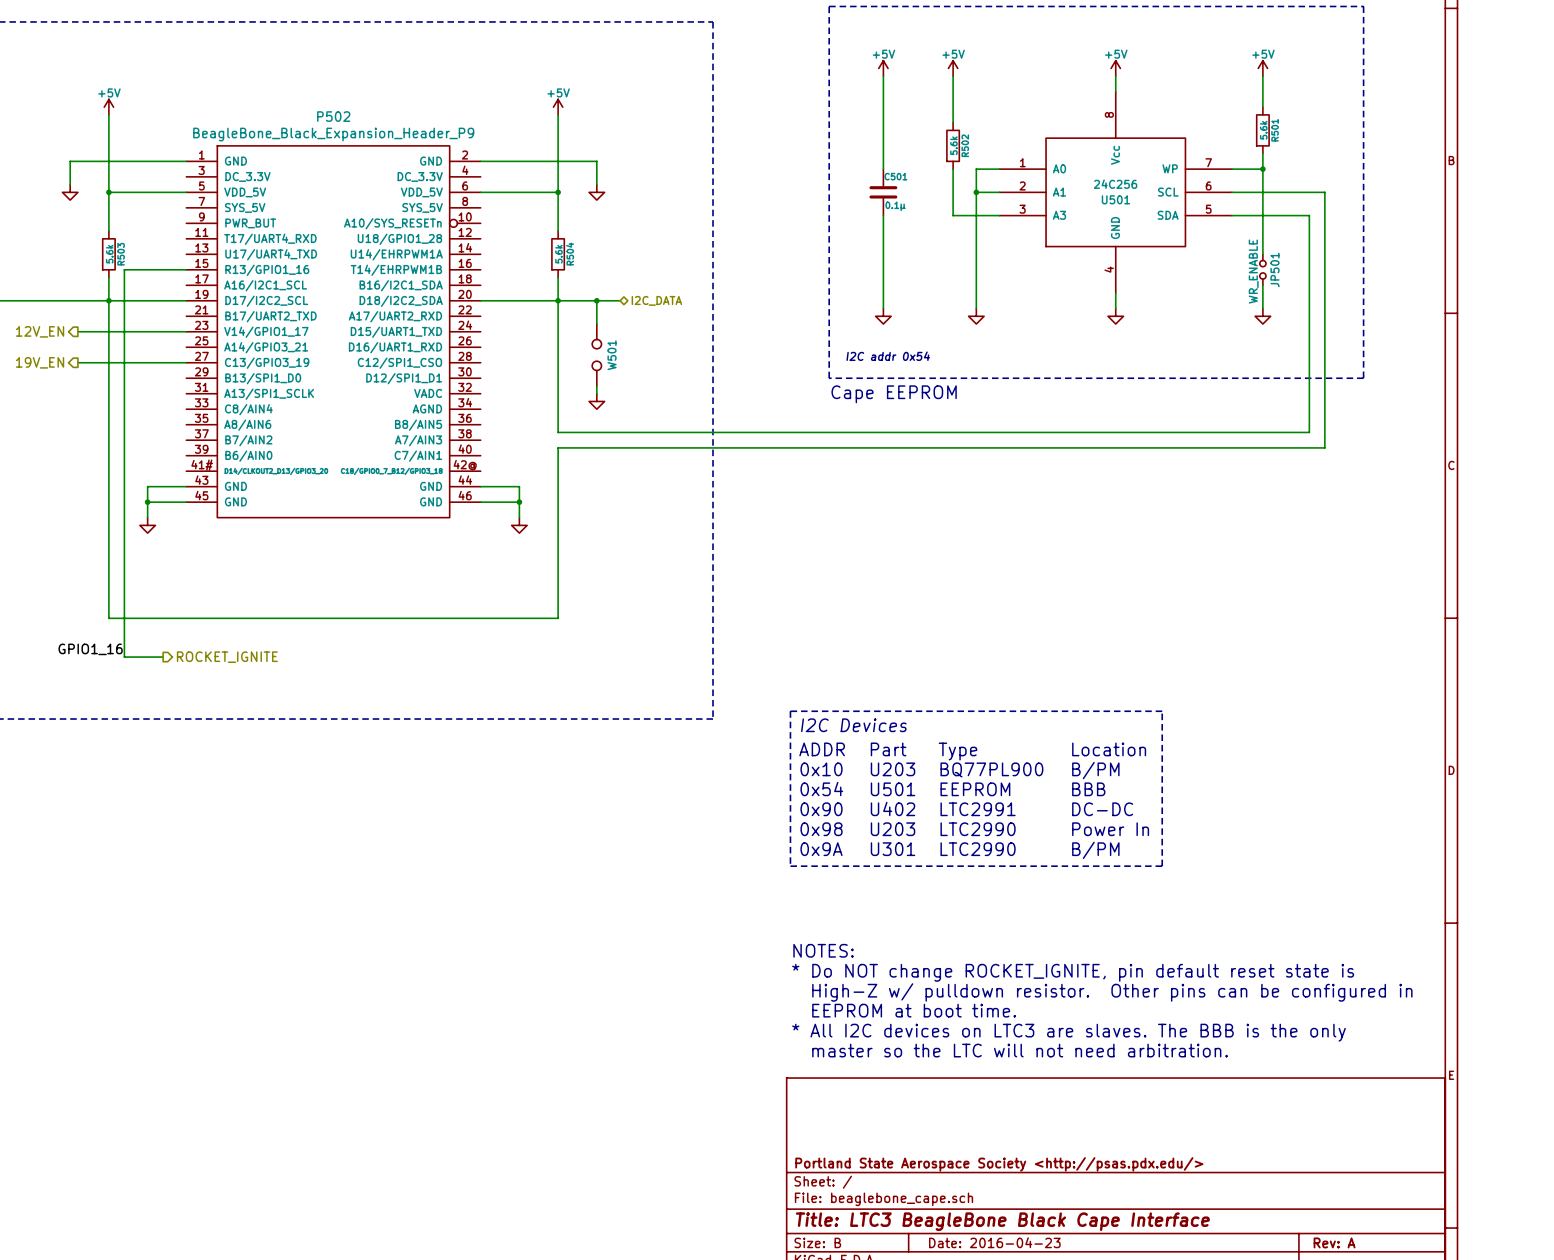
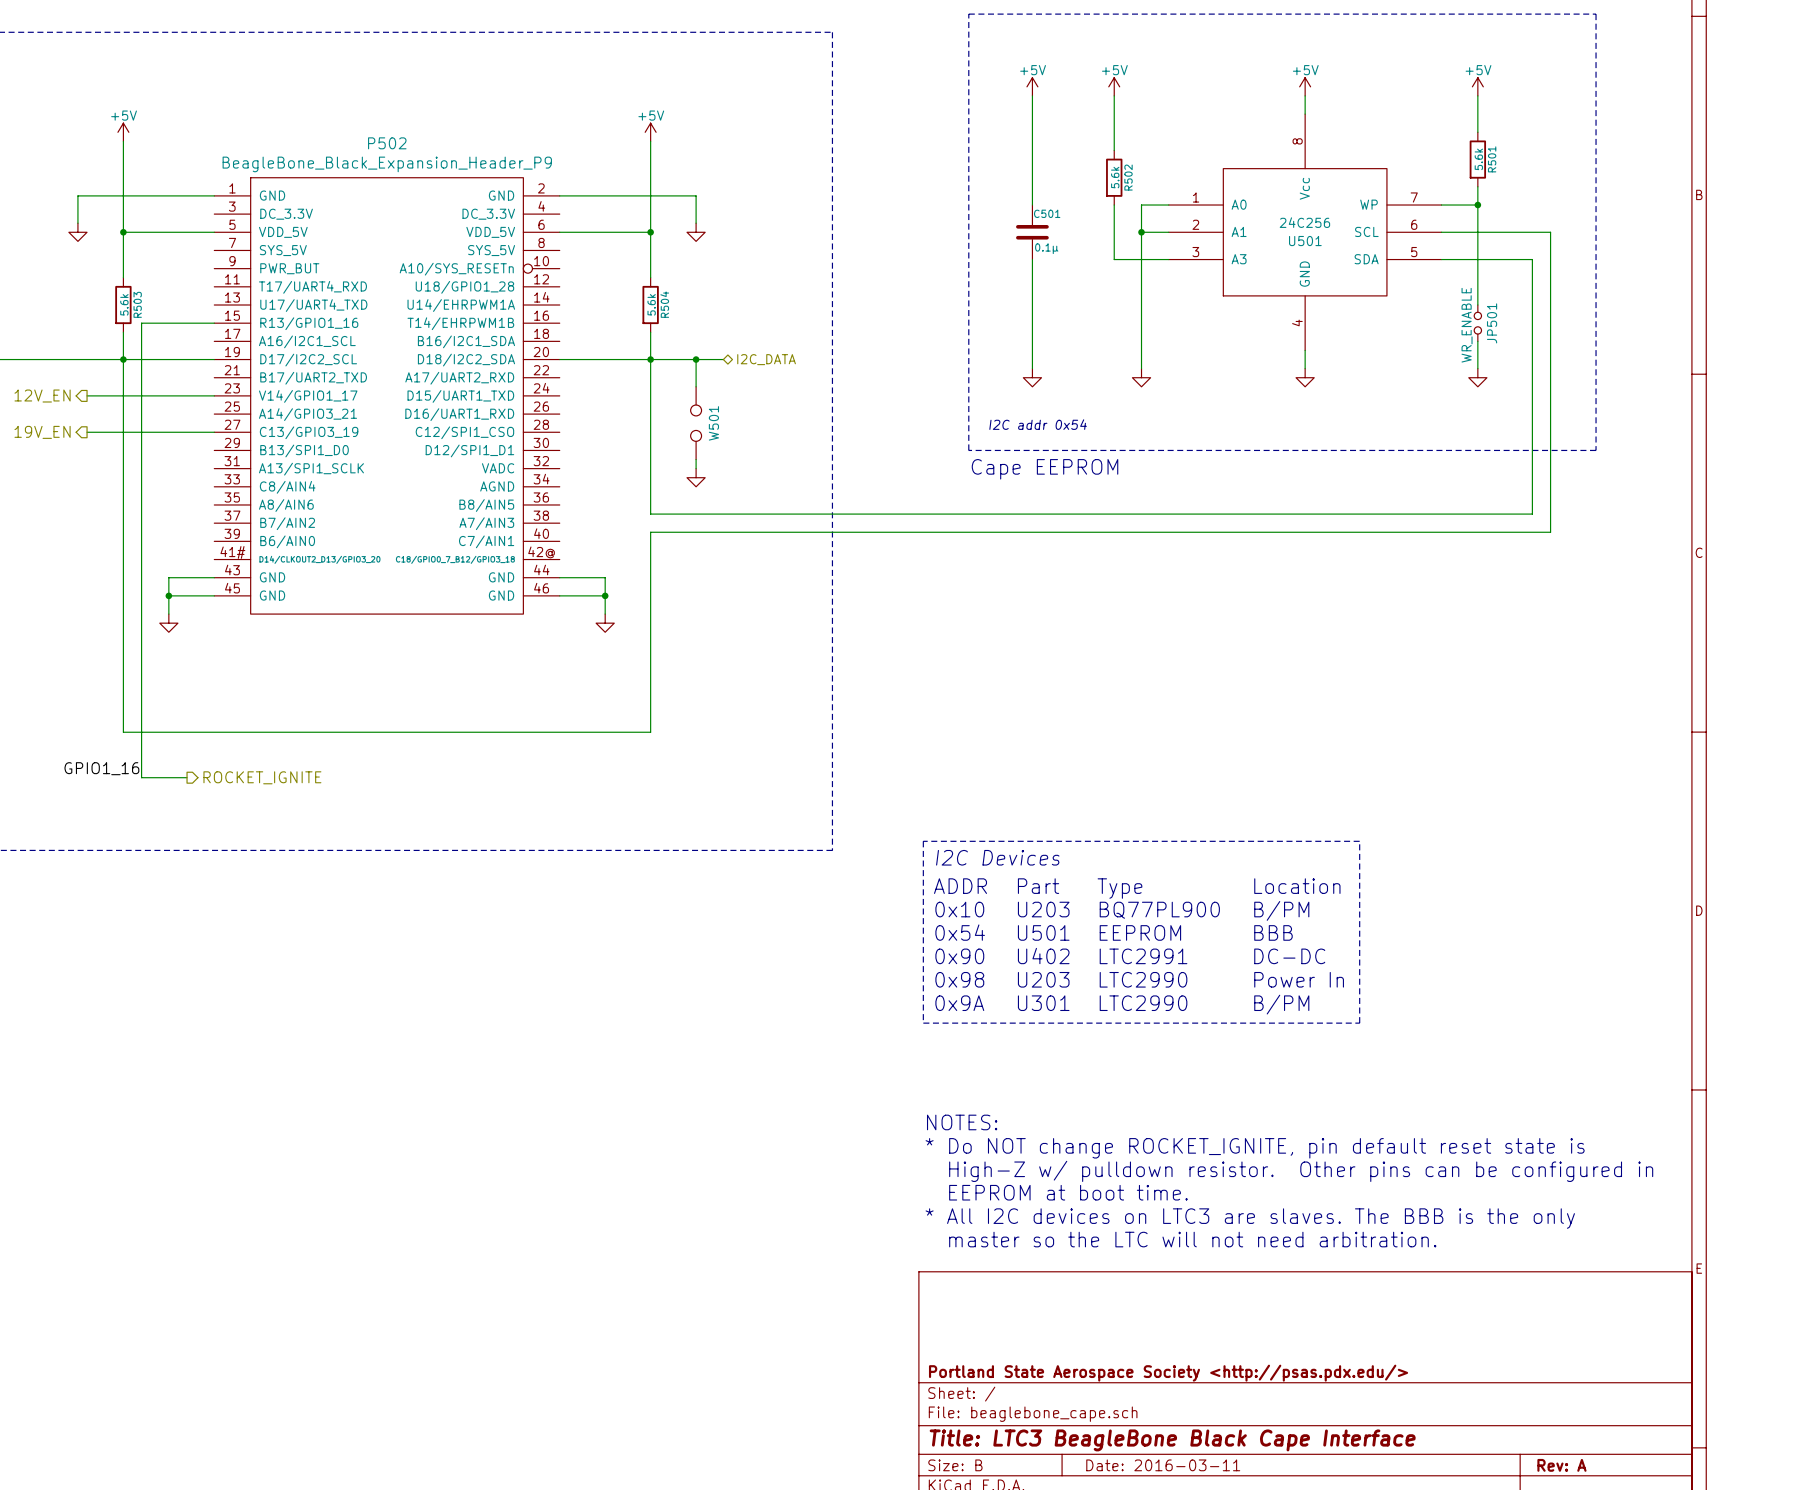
title block: Date: 2016-04-23 (994, 1242) -> Date: 2016-03-11 (1163, 1465)

